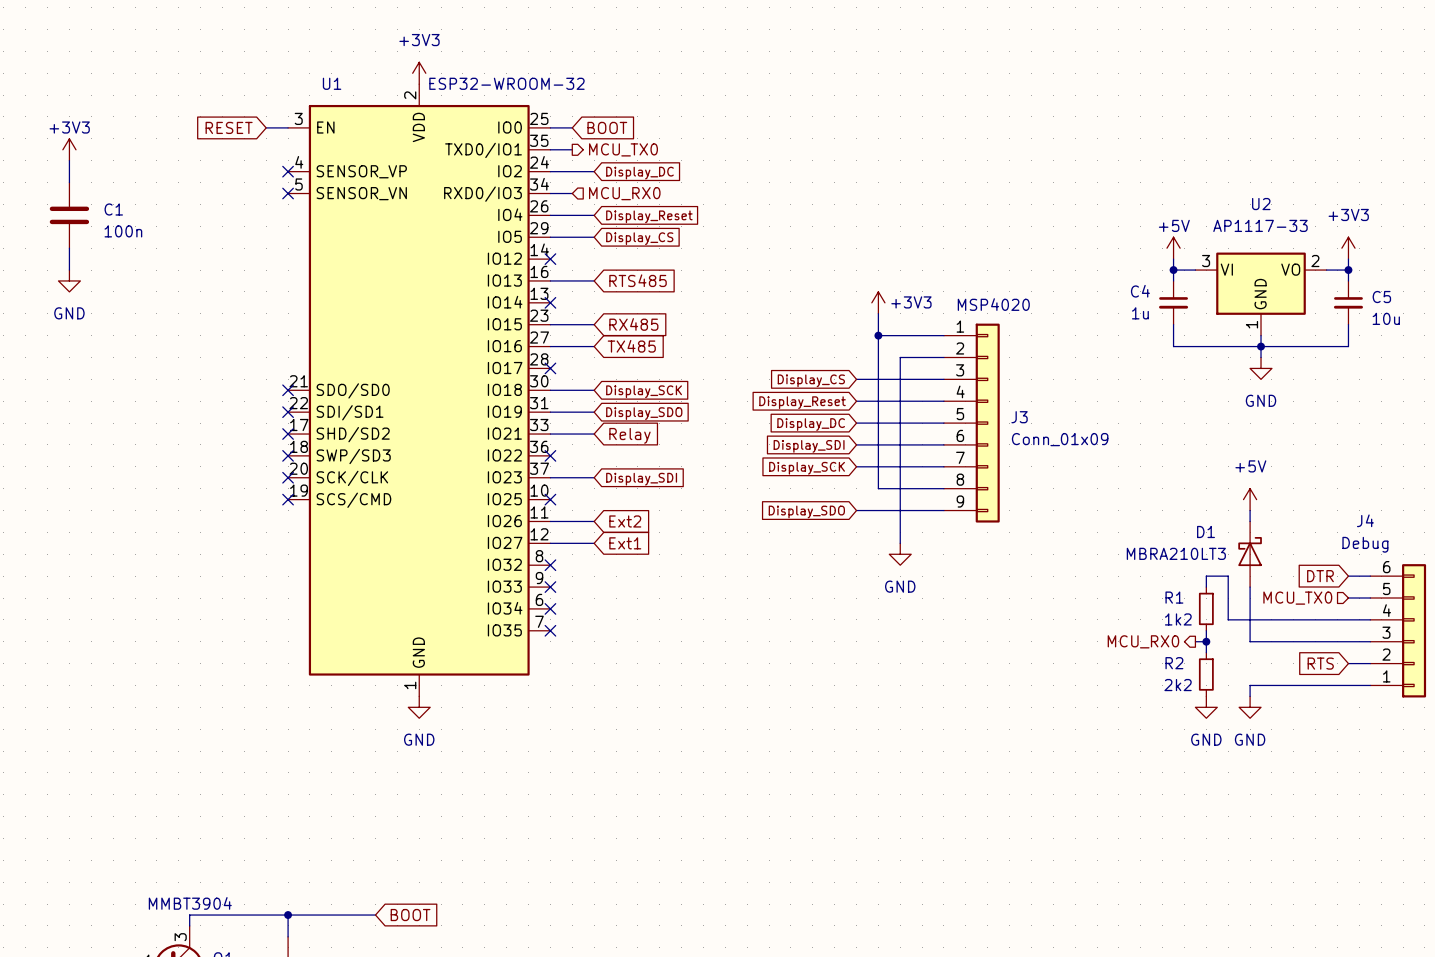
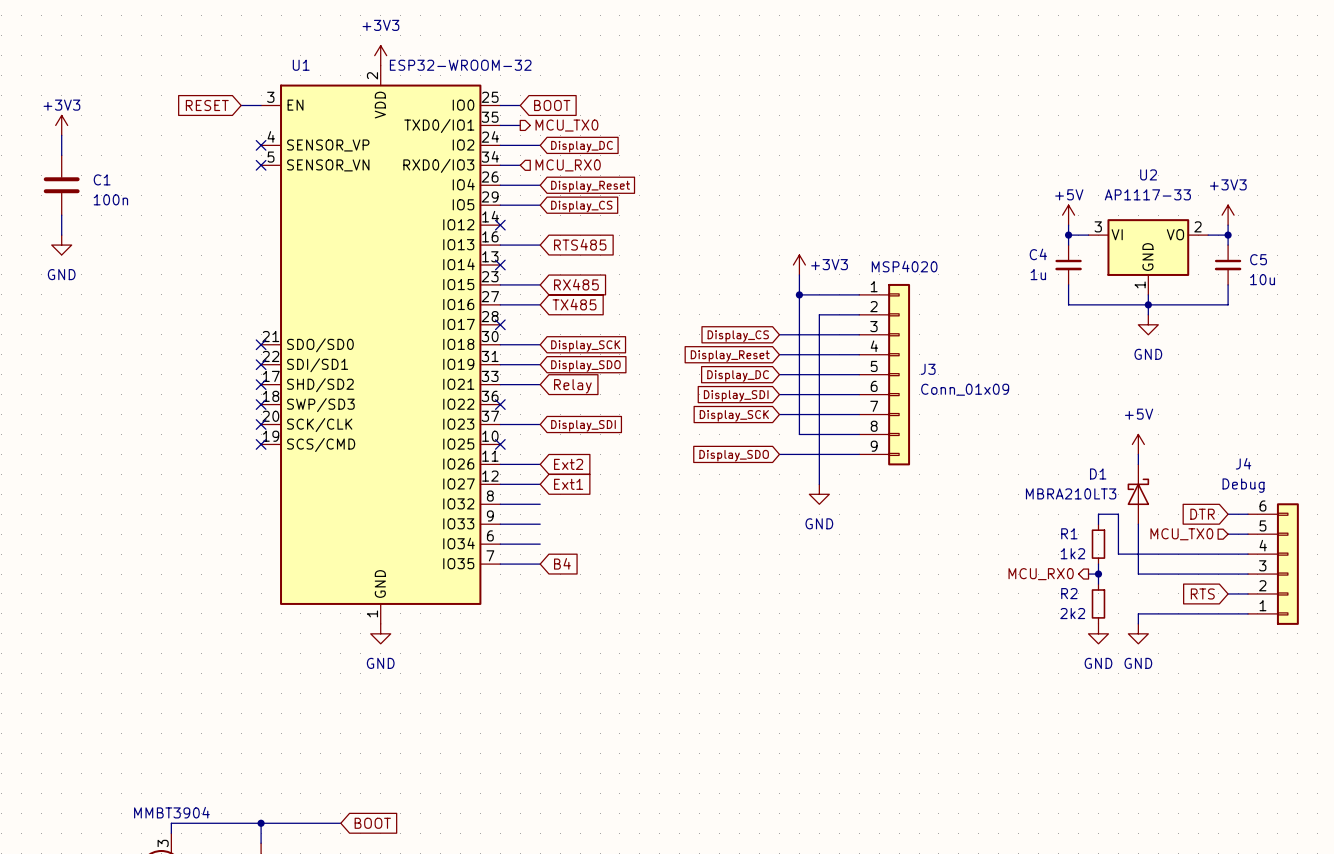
wire: none -> (500, 504) (540, 504)
no-connect mark: (550, 565) -> none
wire: none -> (500, 524) (540, 524)
no-connect mark: (550, 587) -> none
wire: none -> (500, 544) (540, 544)
no-connect mark: (550, 608) -> none
wire: none -> (500, 564) (540, 564)
no-connect mark: (550, 630) -> none
global label: none -> B4 (562, 563)

